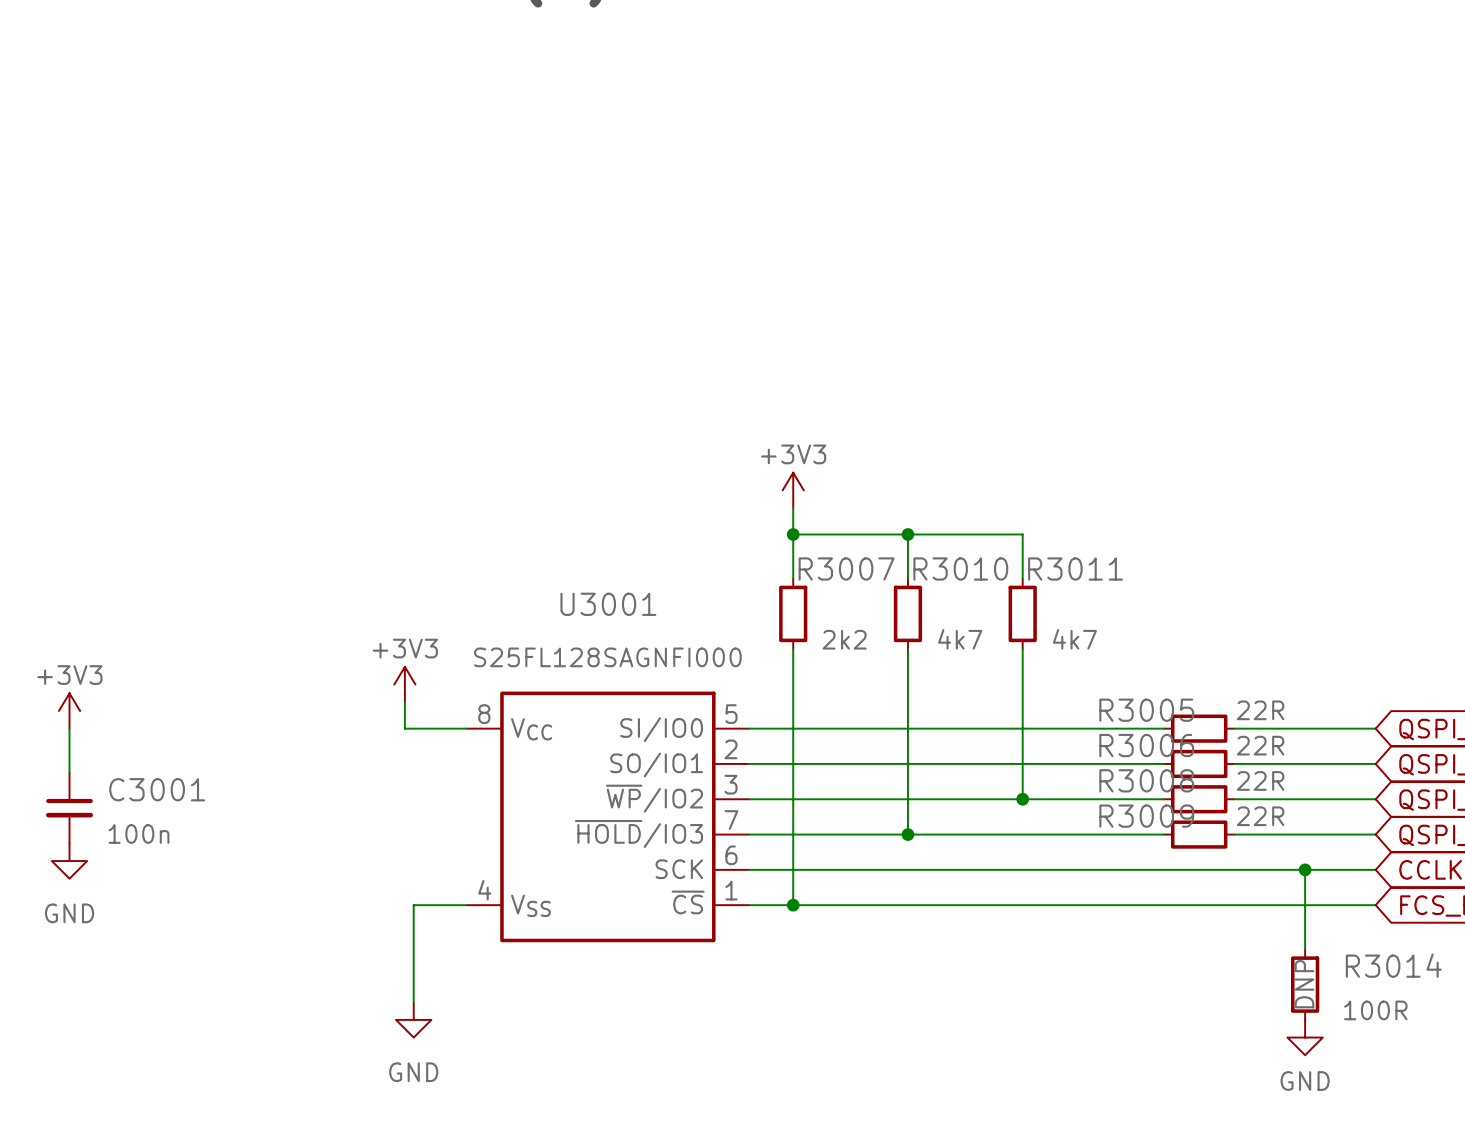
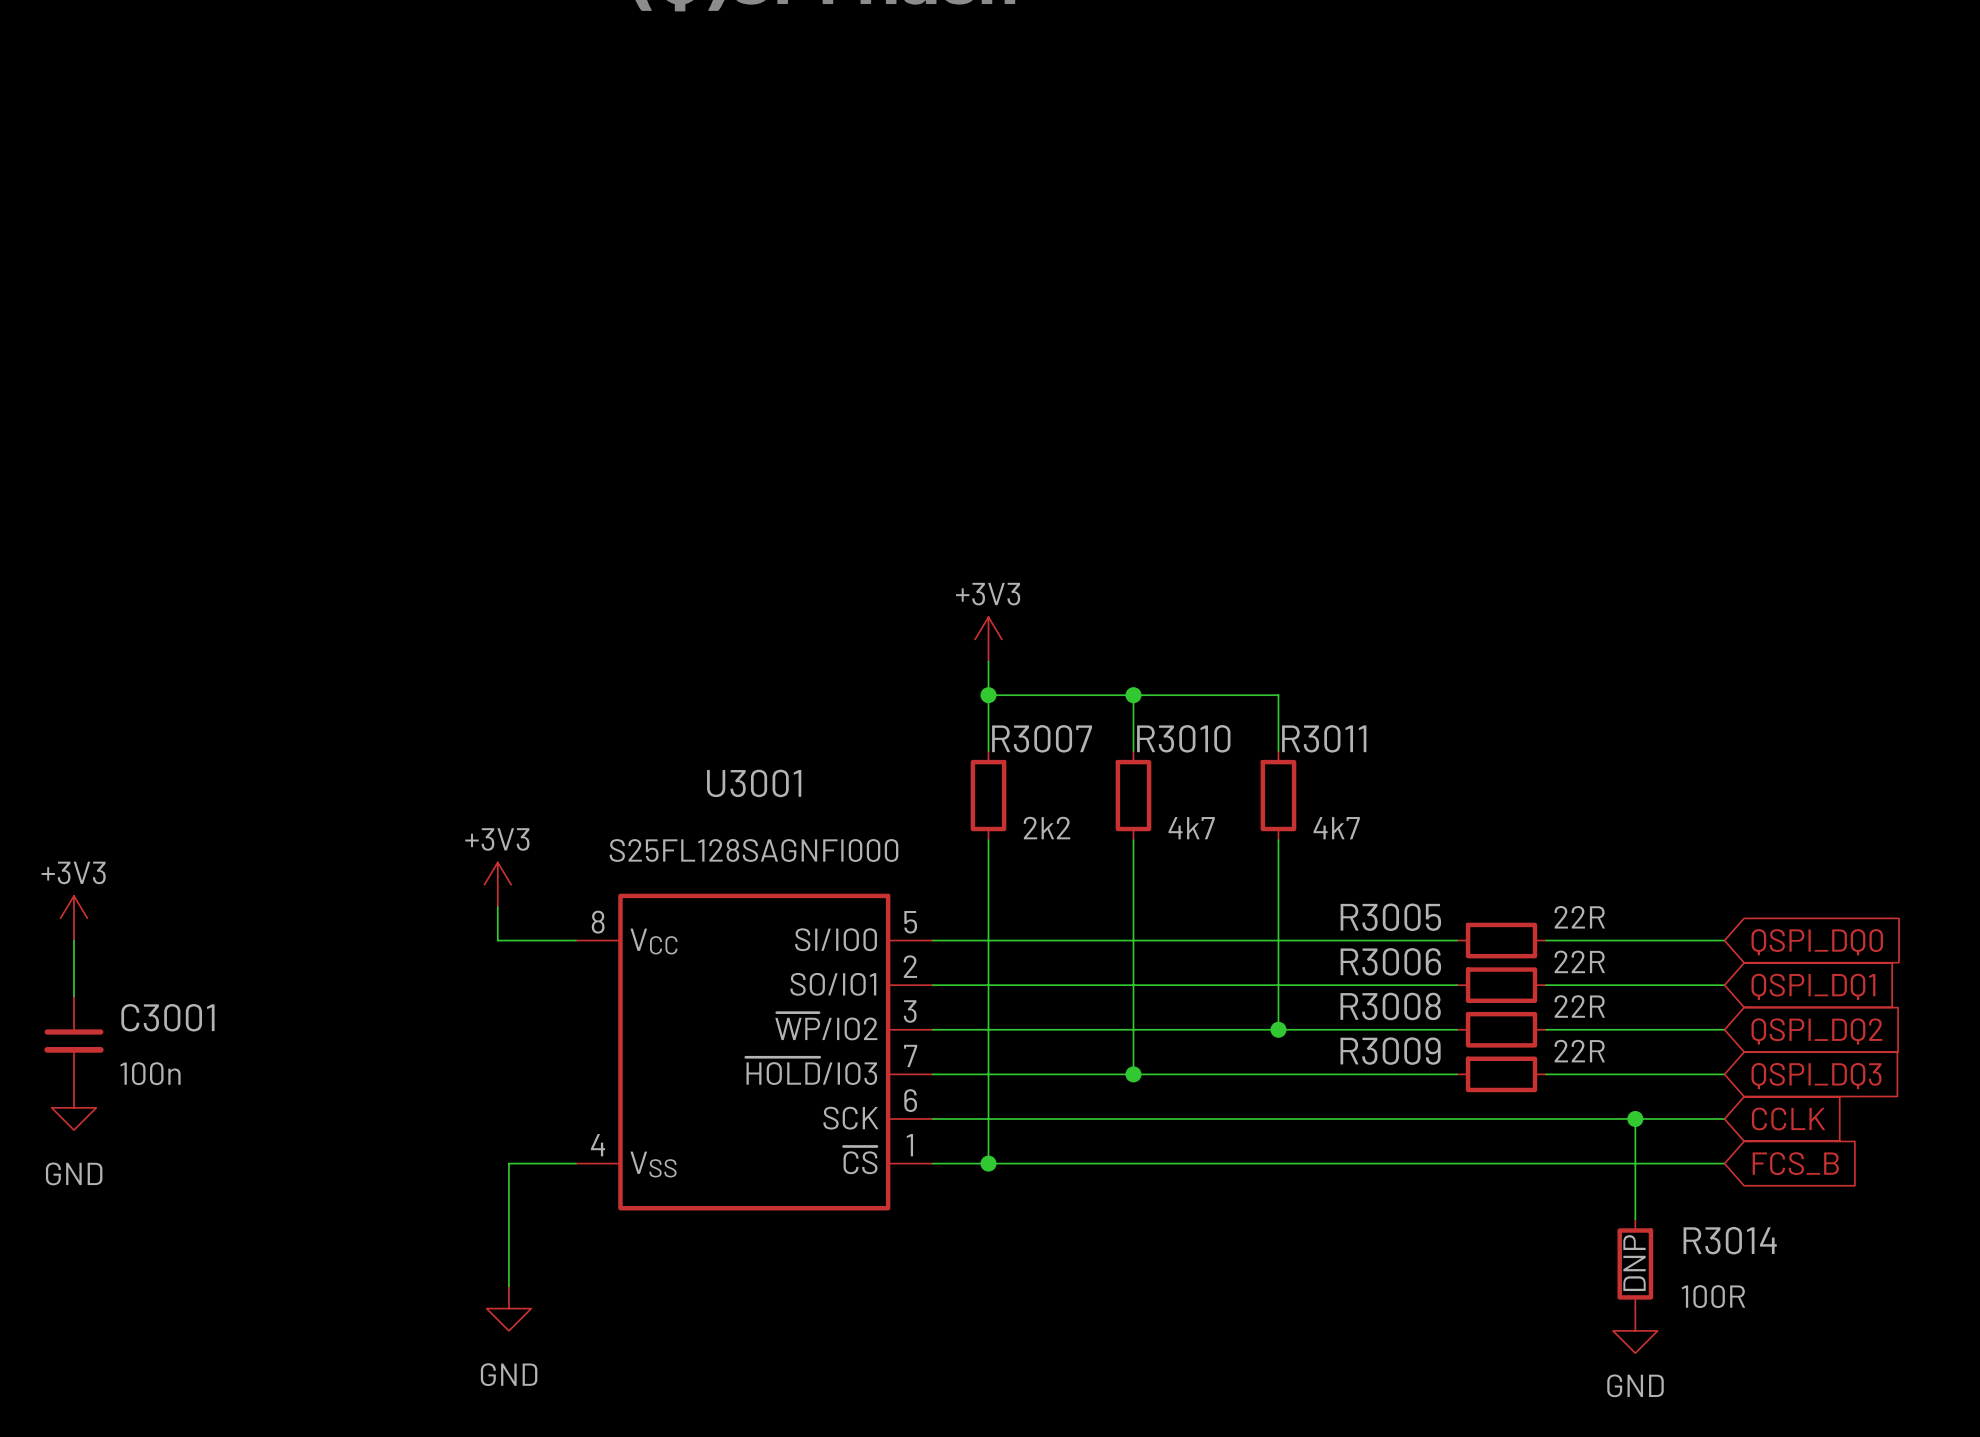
R3005 name position: R3005 (1146, 710) -> R3005 (1390, 917)
R3006 name position: R3006 (1146, 745) -> R3006 (1390, 961)
R3008 name position: R3008 (1146, 780) -> R3008 (1390, 1006)
R3009 name position: R3009 (1146, 816) -> R3009 (1390, 1051)

